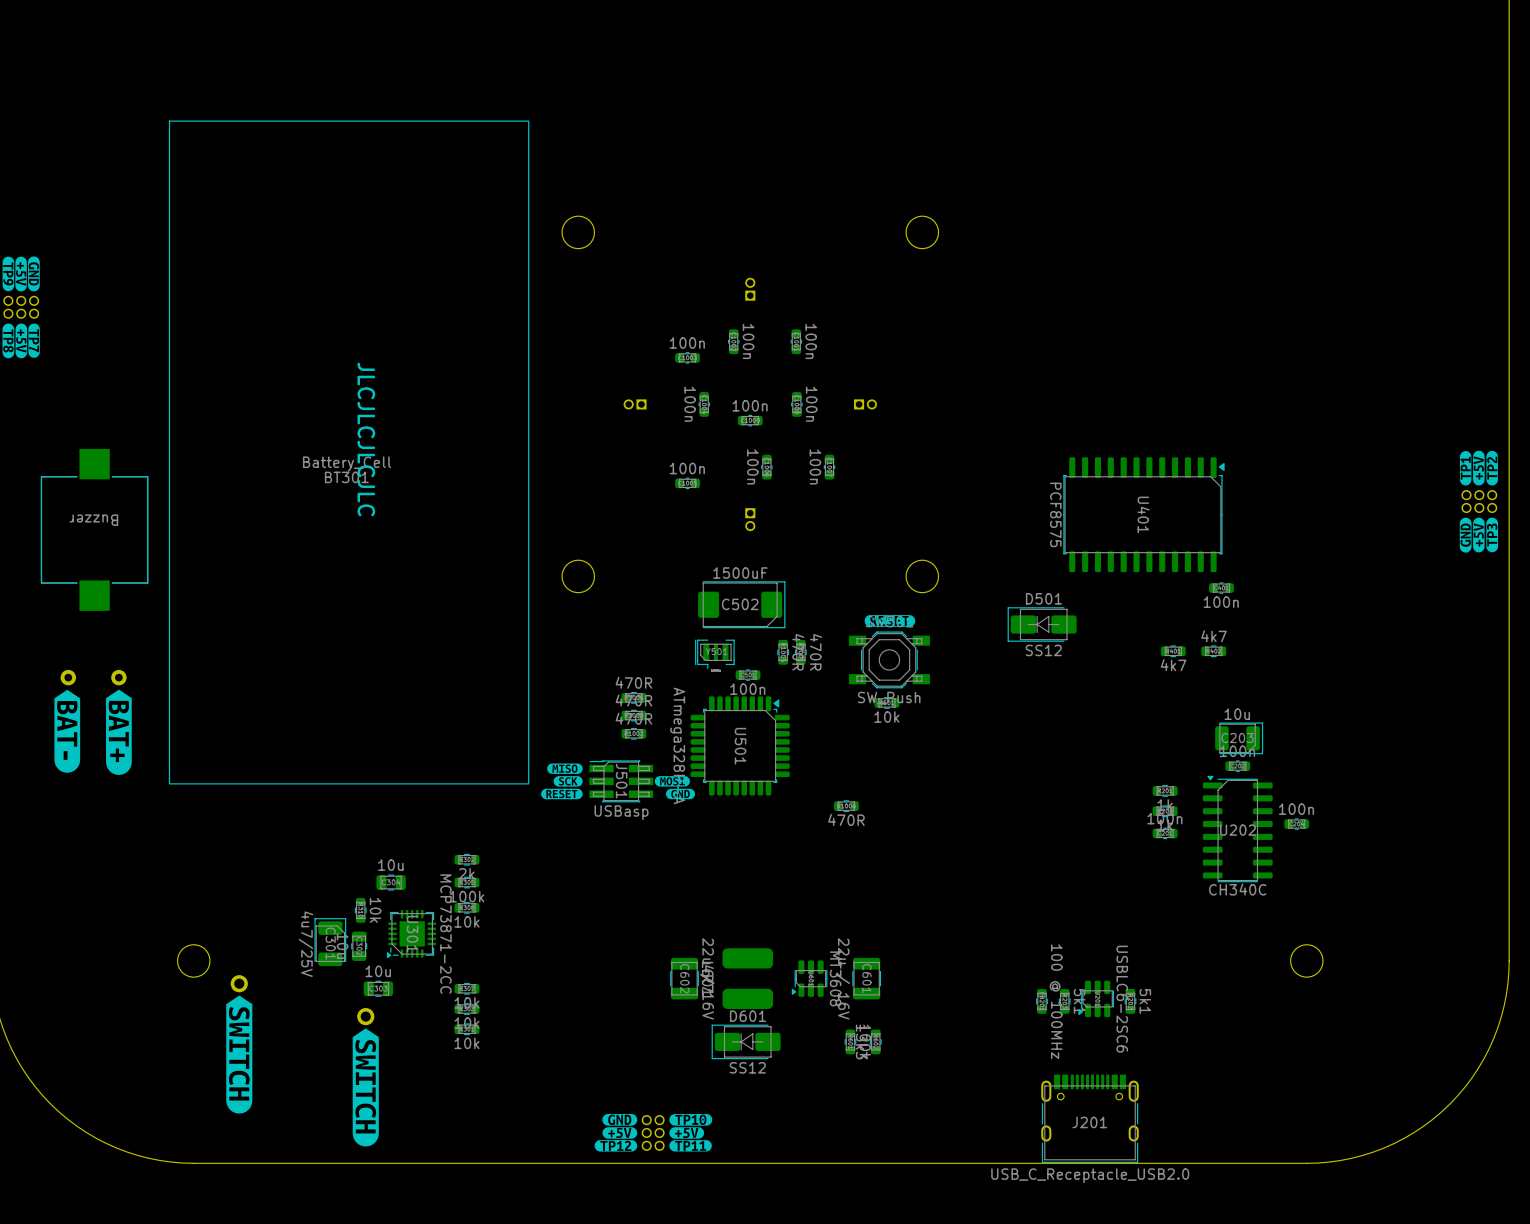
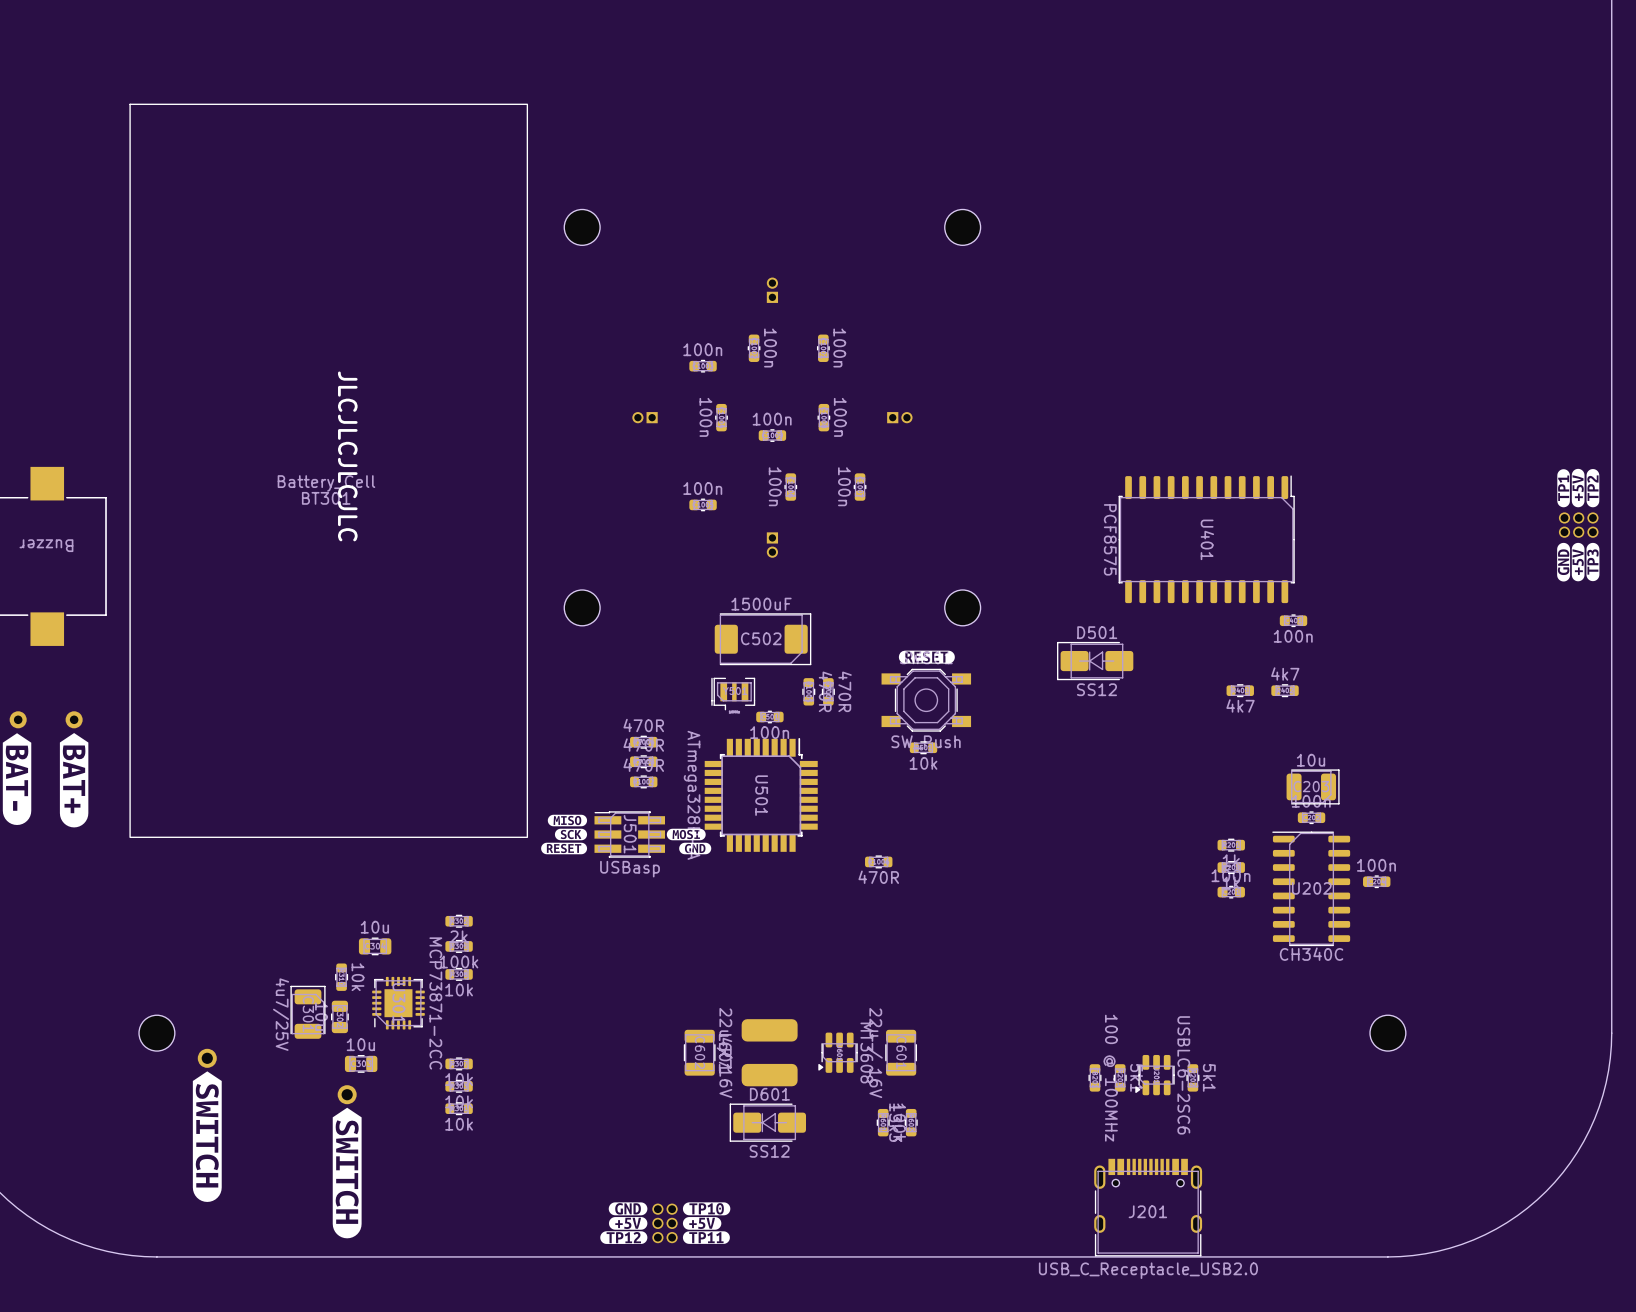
U401 footprint: [1063, 457, 1225, 573] -> [1118, 475, 1295, 604]
U501 footprint: [690, 696, 790, 796] -> [704, 737, 818, 852]
U202 footprint: [1202, 775, 1273, 883] -> [1272, 831, 1351, 947]
U301 footprint: [386, 910, 436, 959] -> [372, 976, 425, 1030]

